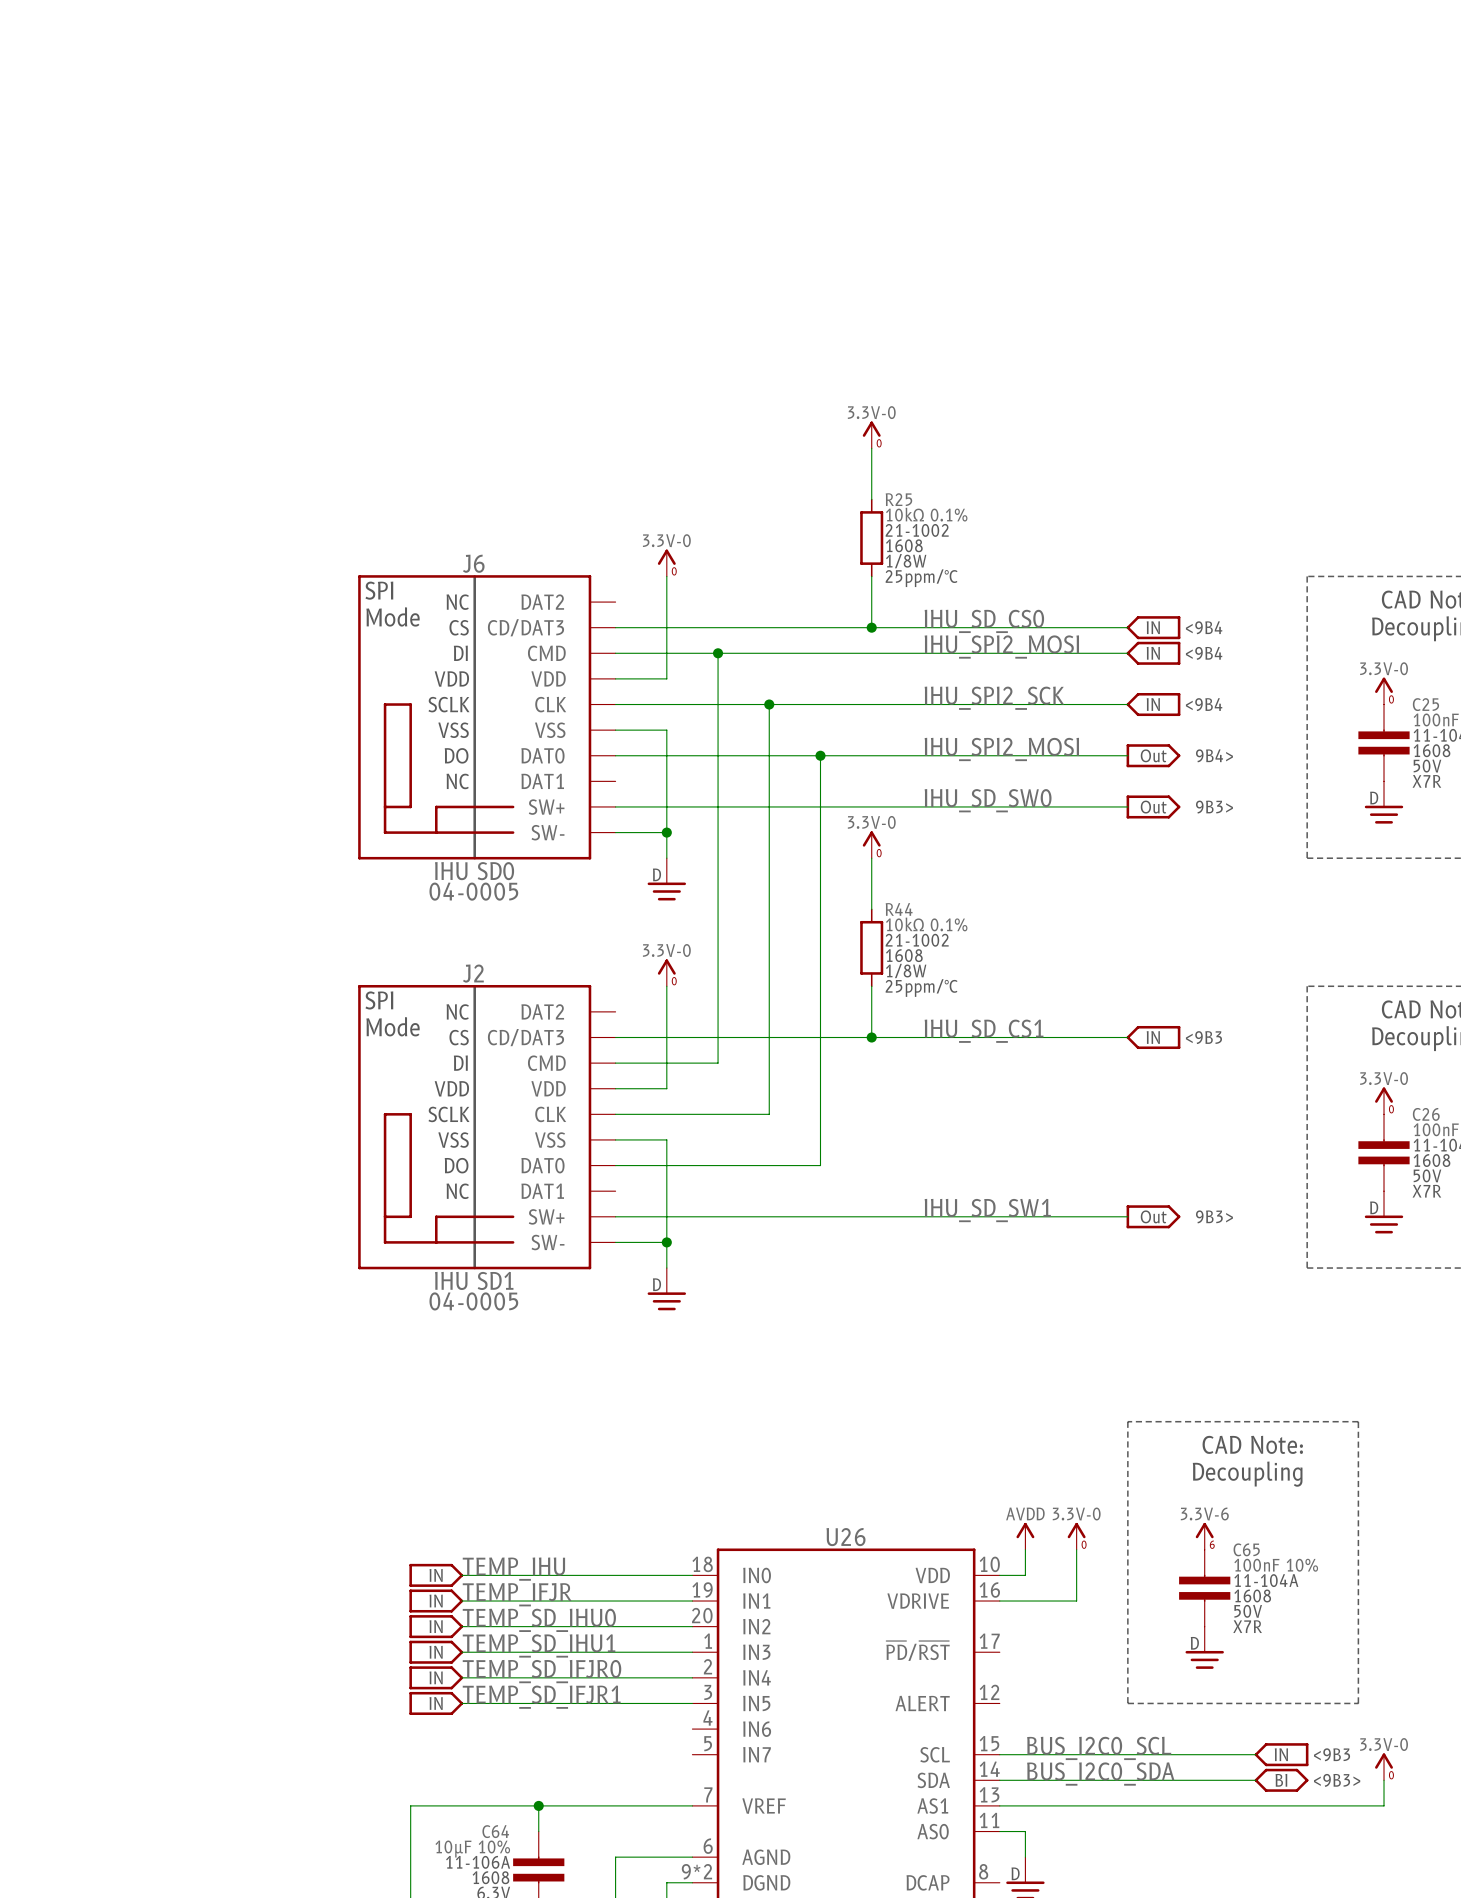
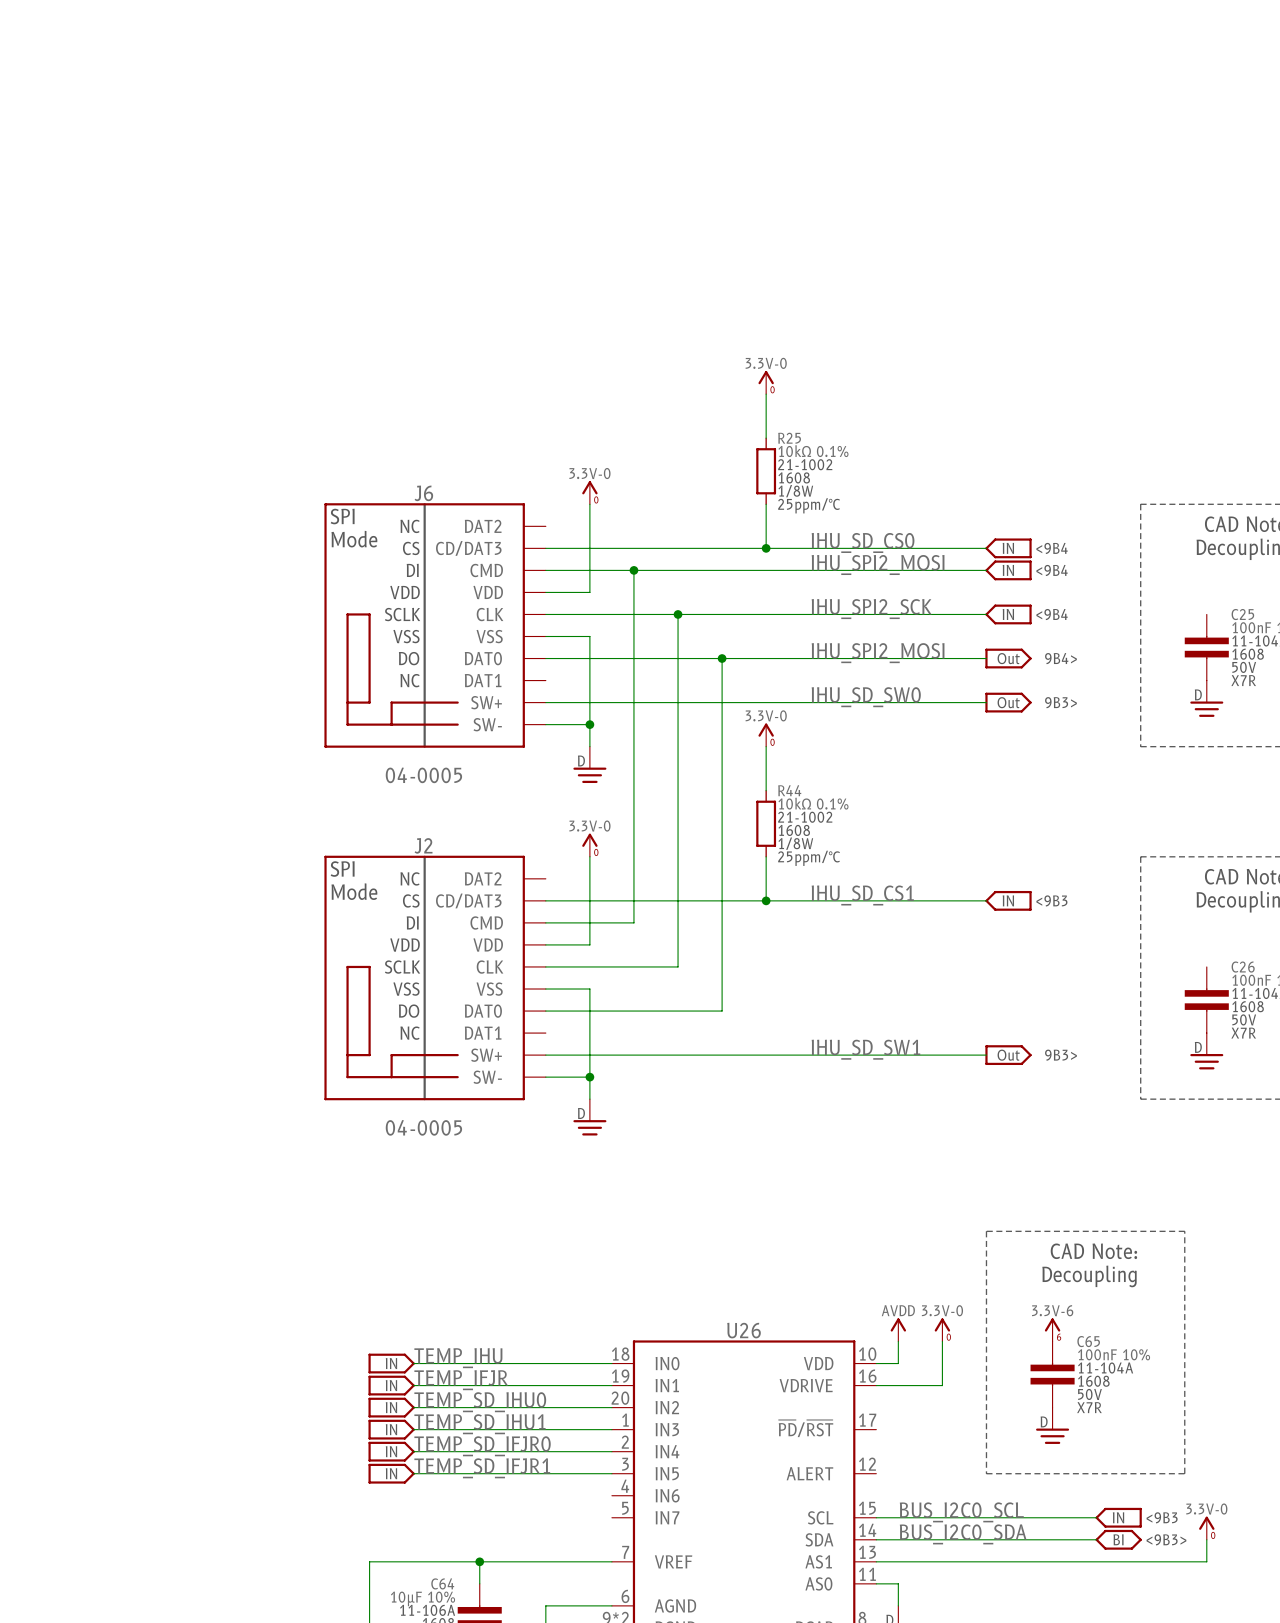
power symbol: 3.3V-0 (1384, 691) -> none
J6 value: IHU SD0 (474, 871) -> none
power symbol: 3.3V-0 (1384, 1100) -> none
J2 value: IHU SD1 (474, 1280) -> none

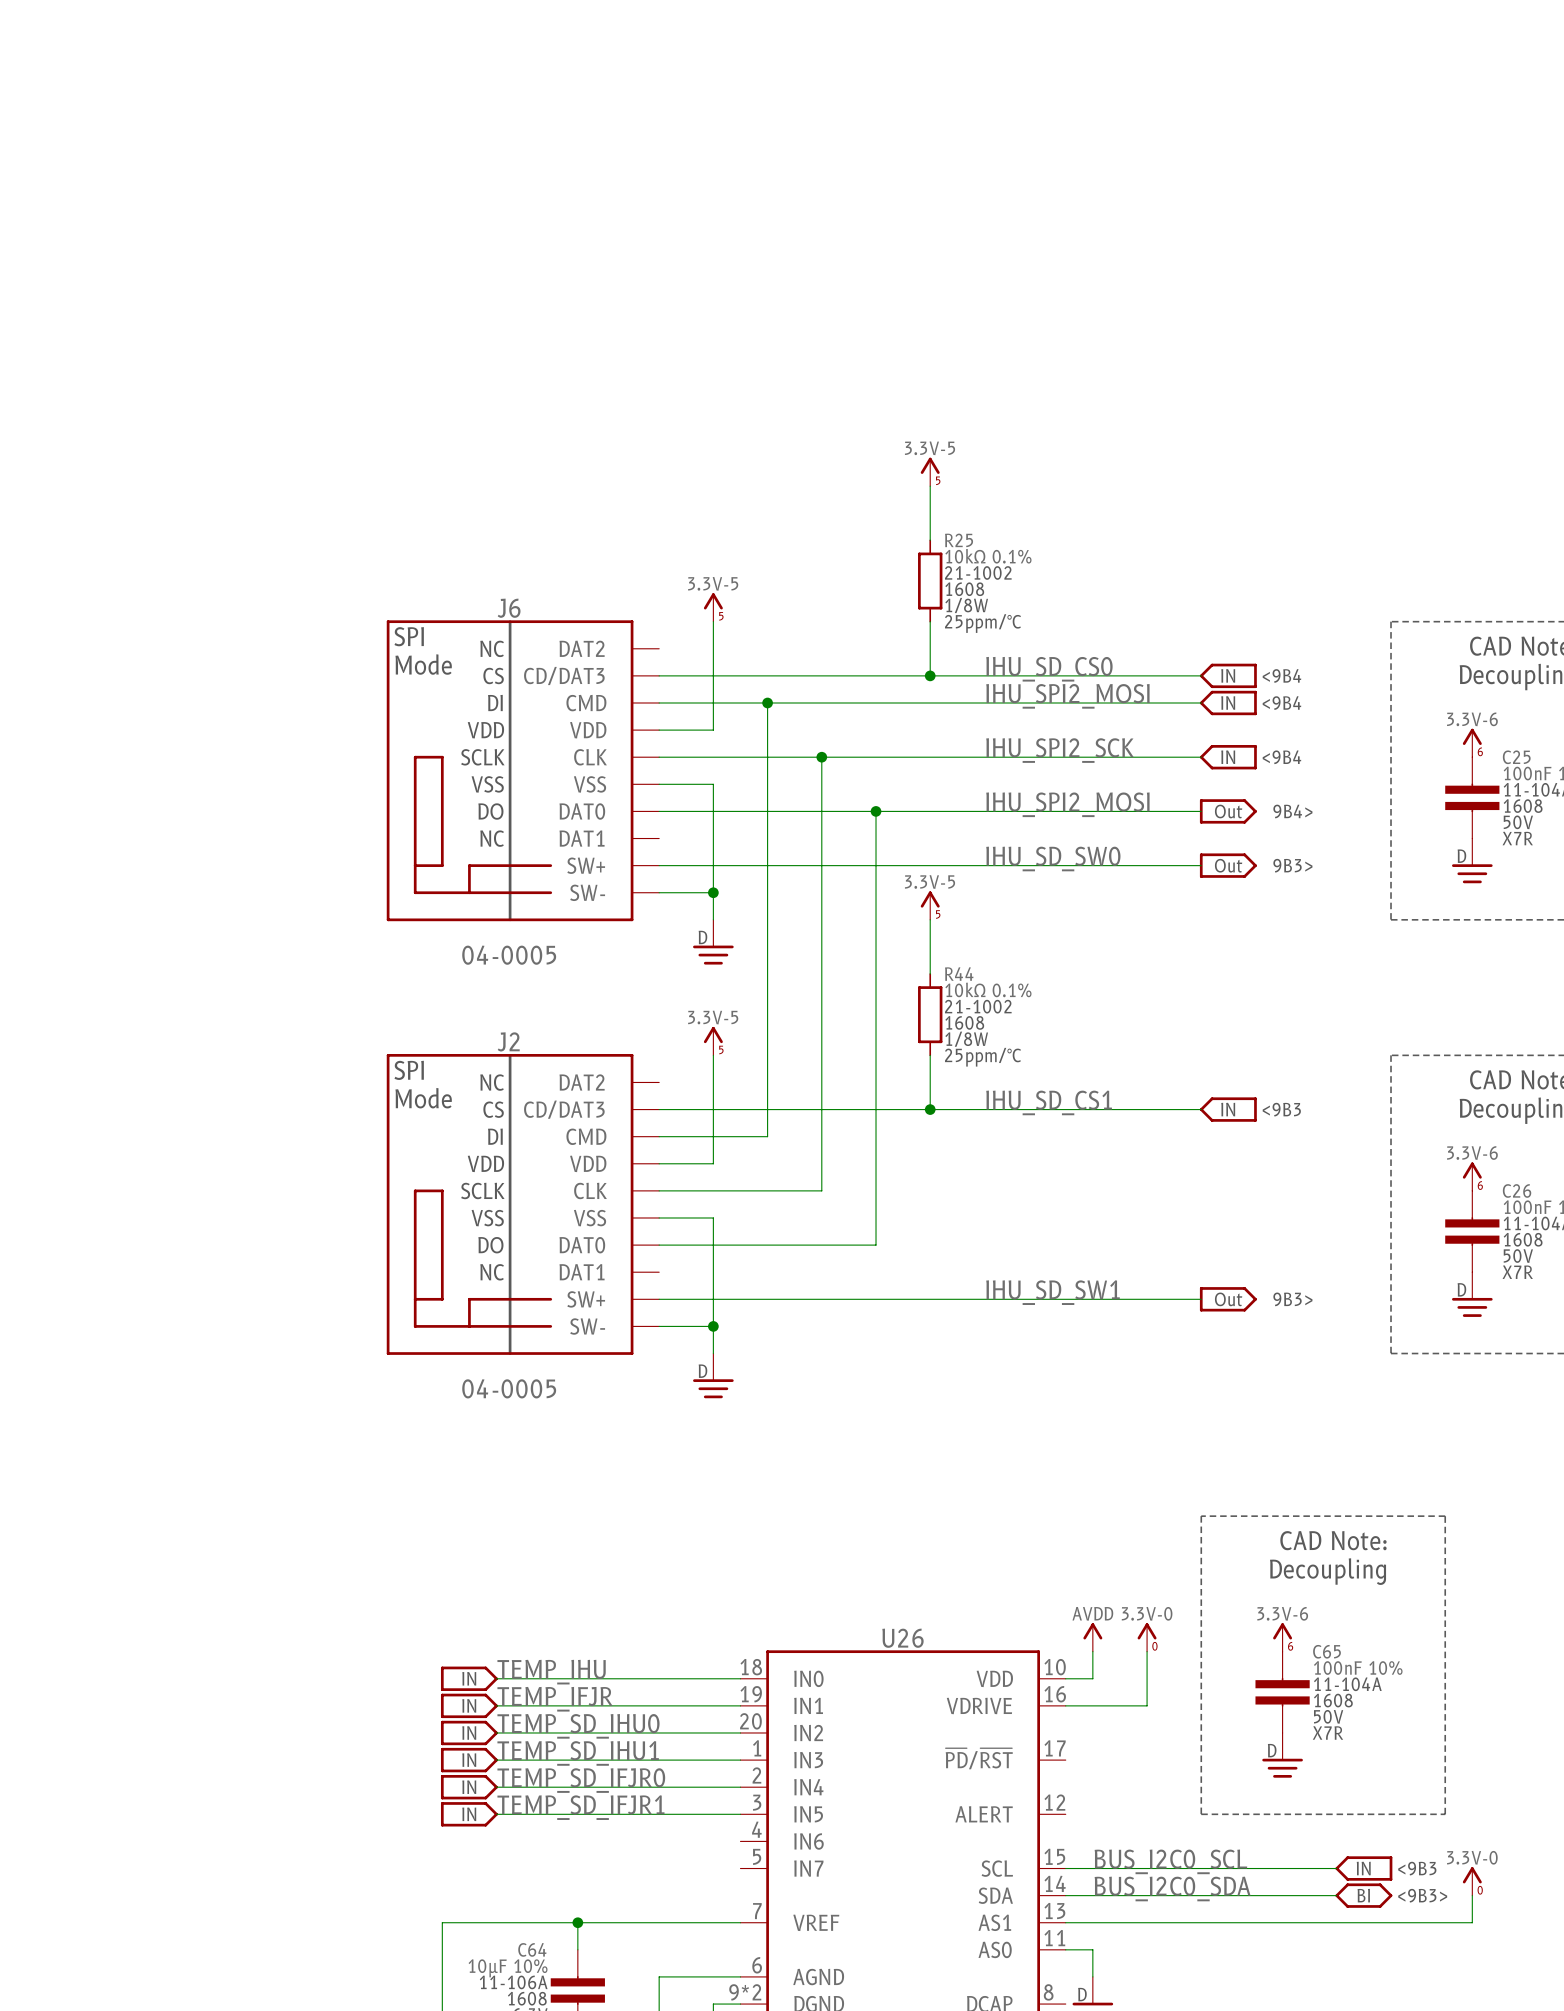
power symbol: 3.3V-0 (766, 382) -> 3.3V-5 (930, 471)
power symbol: 3.3V-0 (589, 492) -> 3.3V-5 (713, 607)
power symbol: none -> 3.3V-6 (1472, 742)
power symbol: 3.3V-0 (766, 735) -> 3.3V-5 (930, 905)
power symbol: 3.3V-0 (589, 845) -> 3.3V-5 (713, 1041)
power symbol: none -> 3.3V-6 (1472, 1176)

